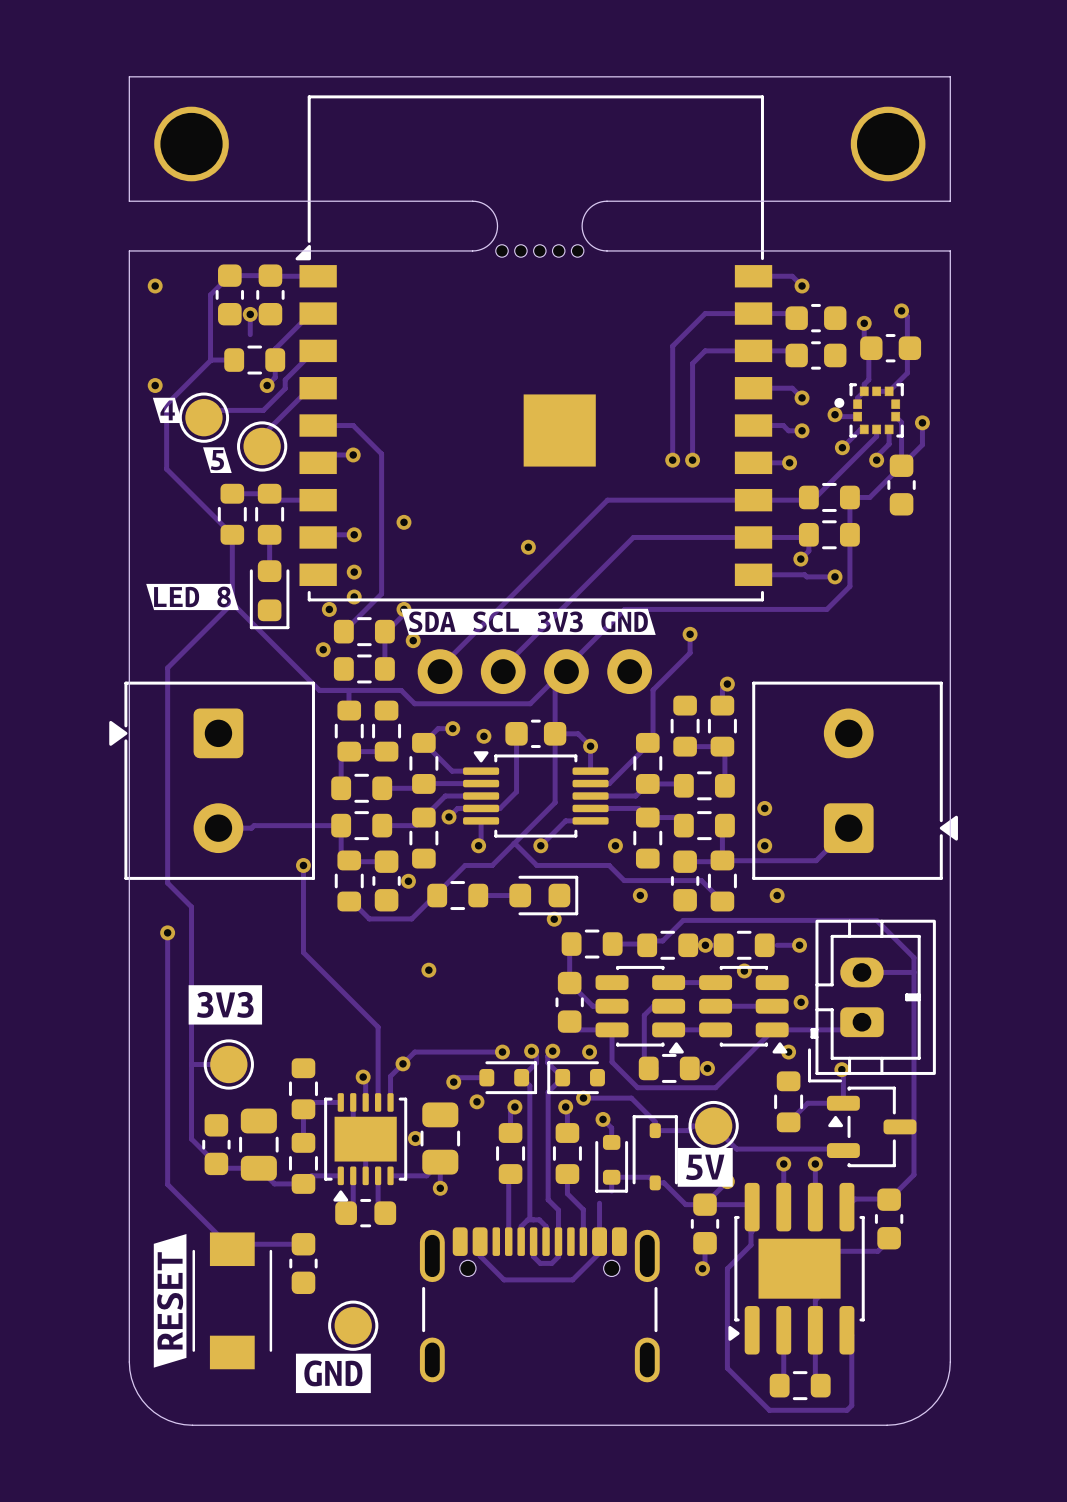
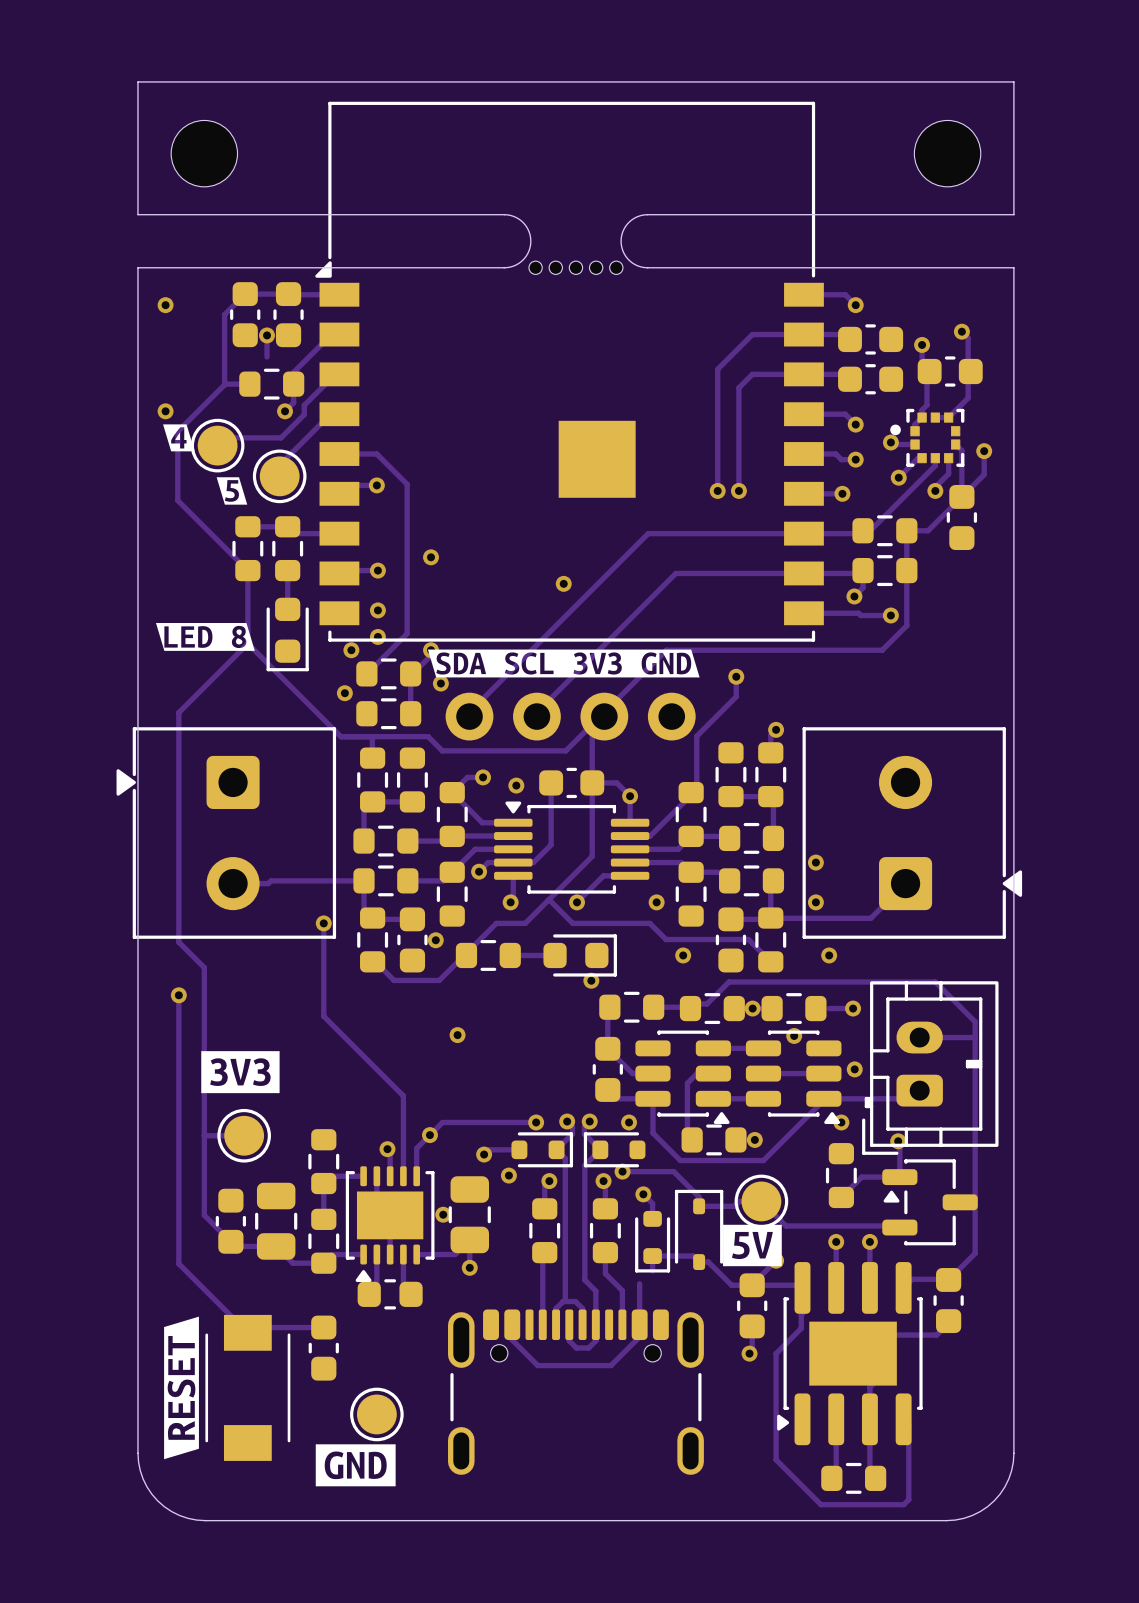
part footprint: [154, 106, 229, 182] -> [171, 120, 238, 187]
part footprint: [850, 106, 926, 182] -> [914, 120, 981, 187]

